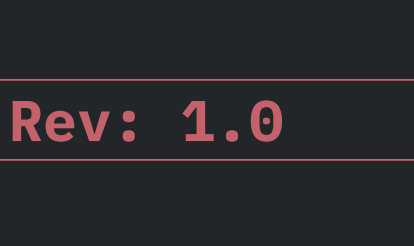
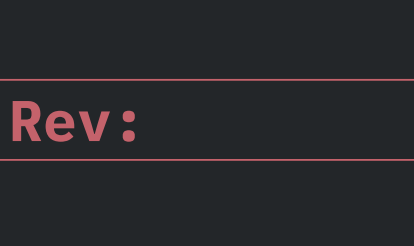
title block: Rev: 1.0 (147, 121) -> Rev: (73, 121)

